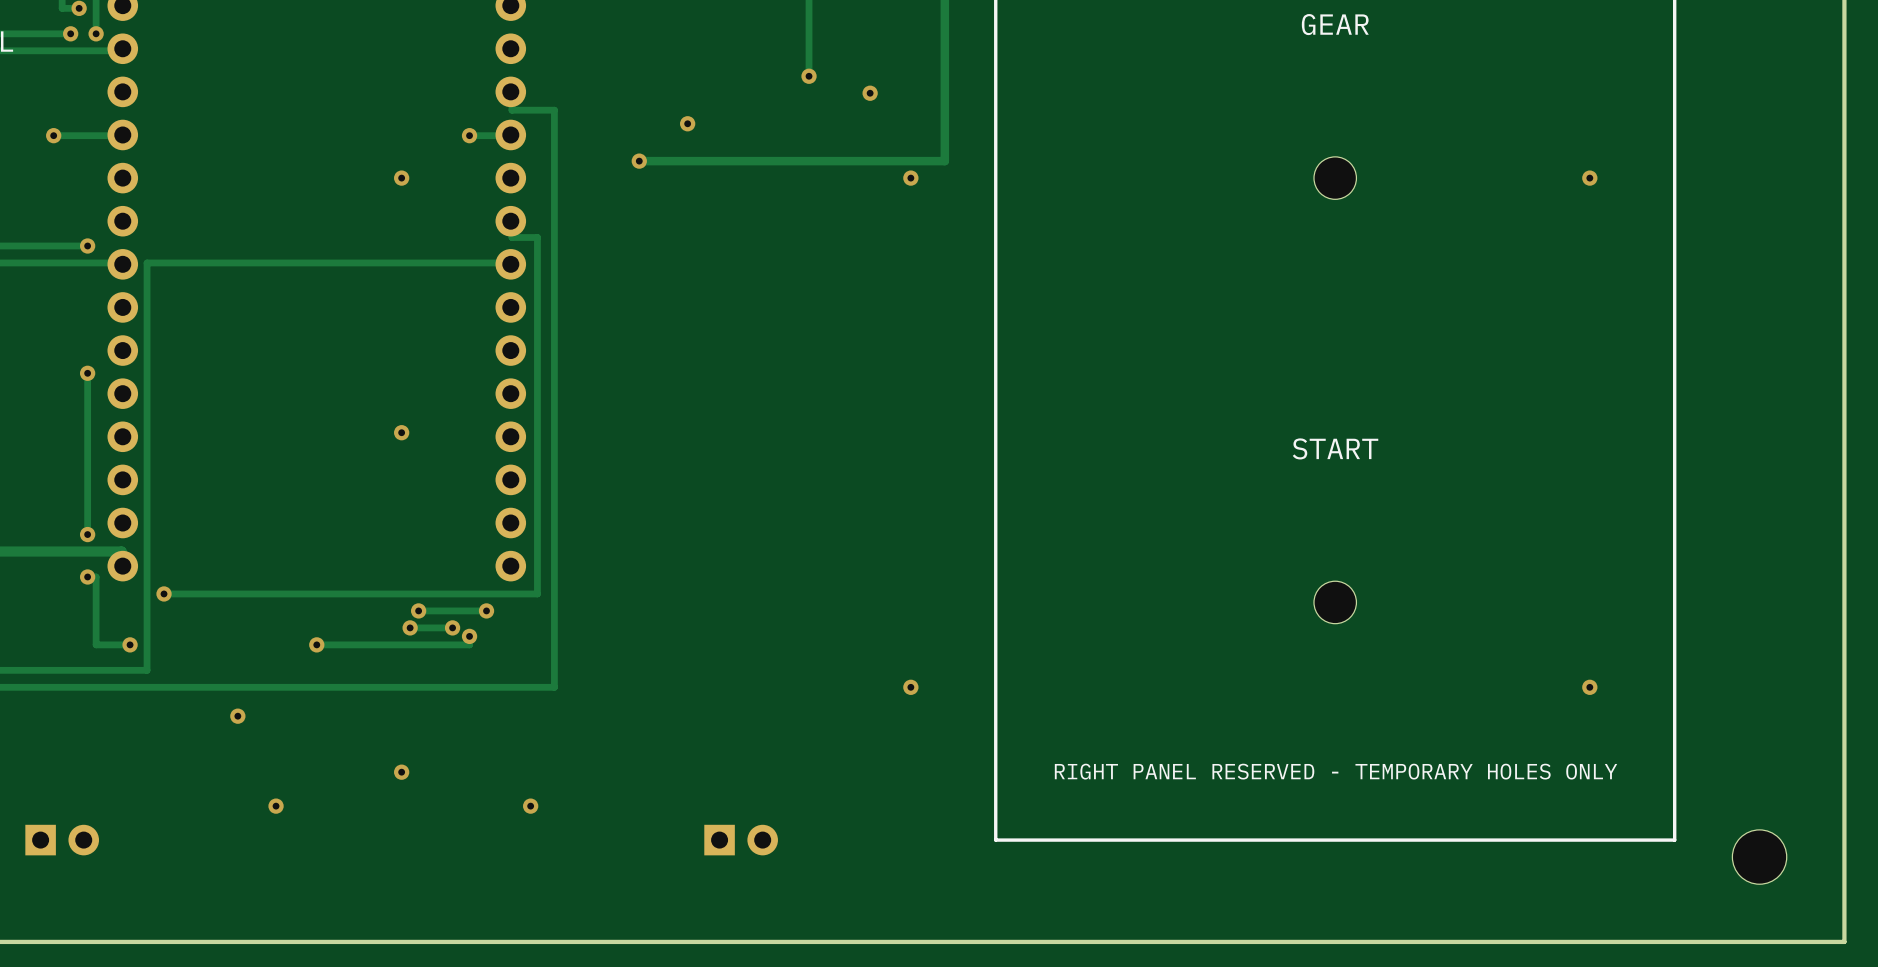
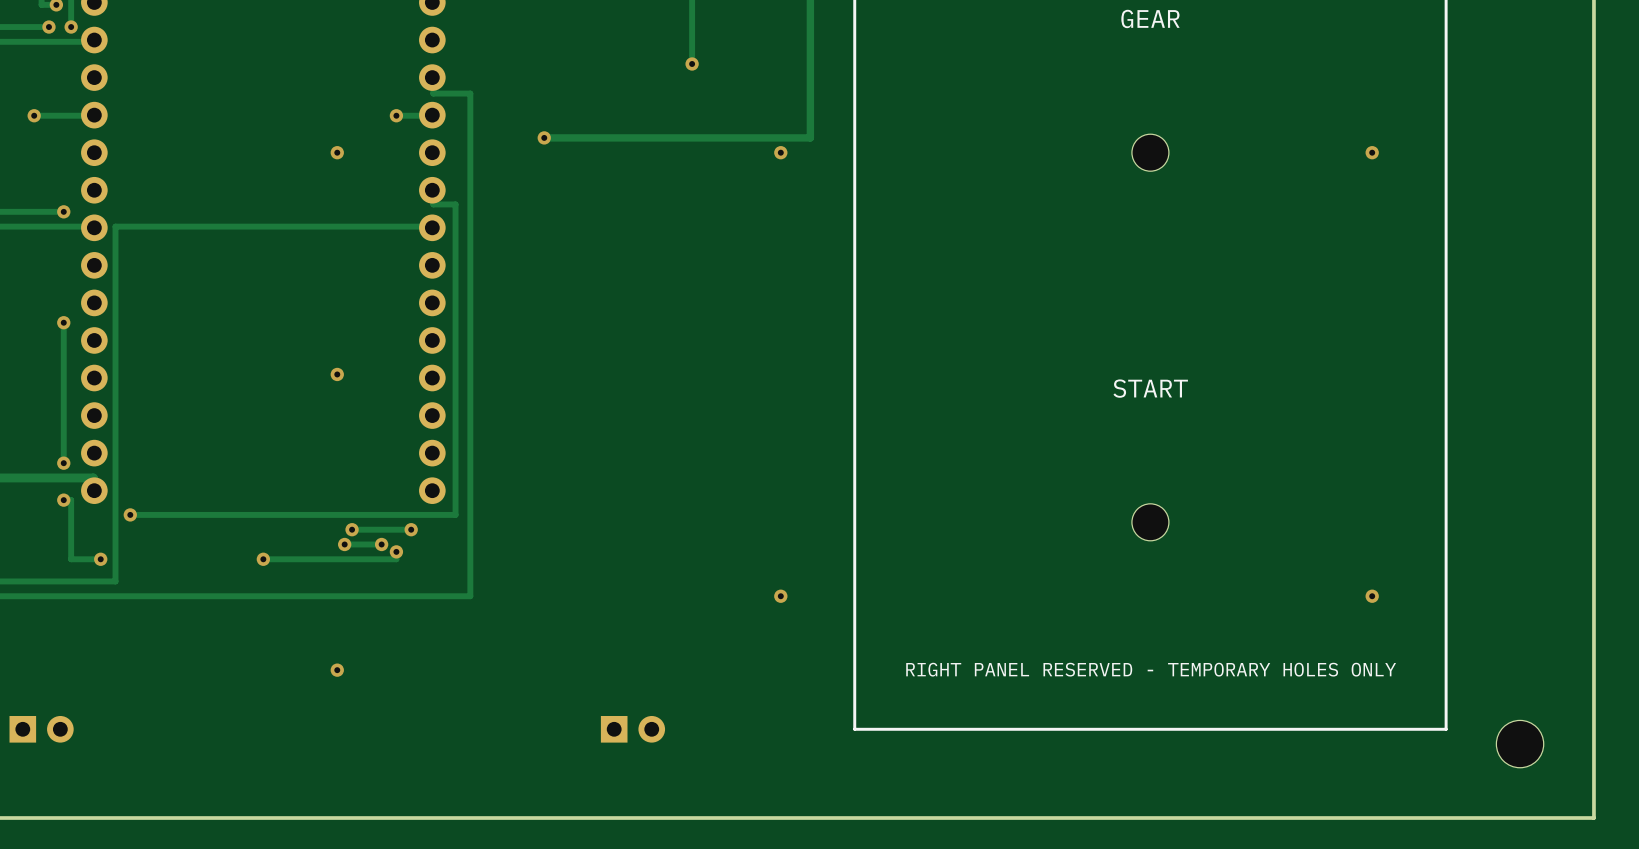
via: (870, 93) -> none
via: (687, 123) -> none
via: (237, 716) -> none
via: (276, 806) -> none
via: (530, 806) -> none

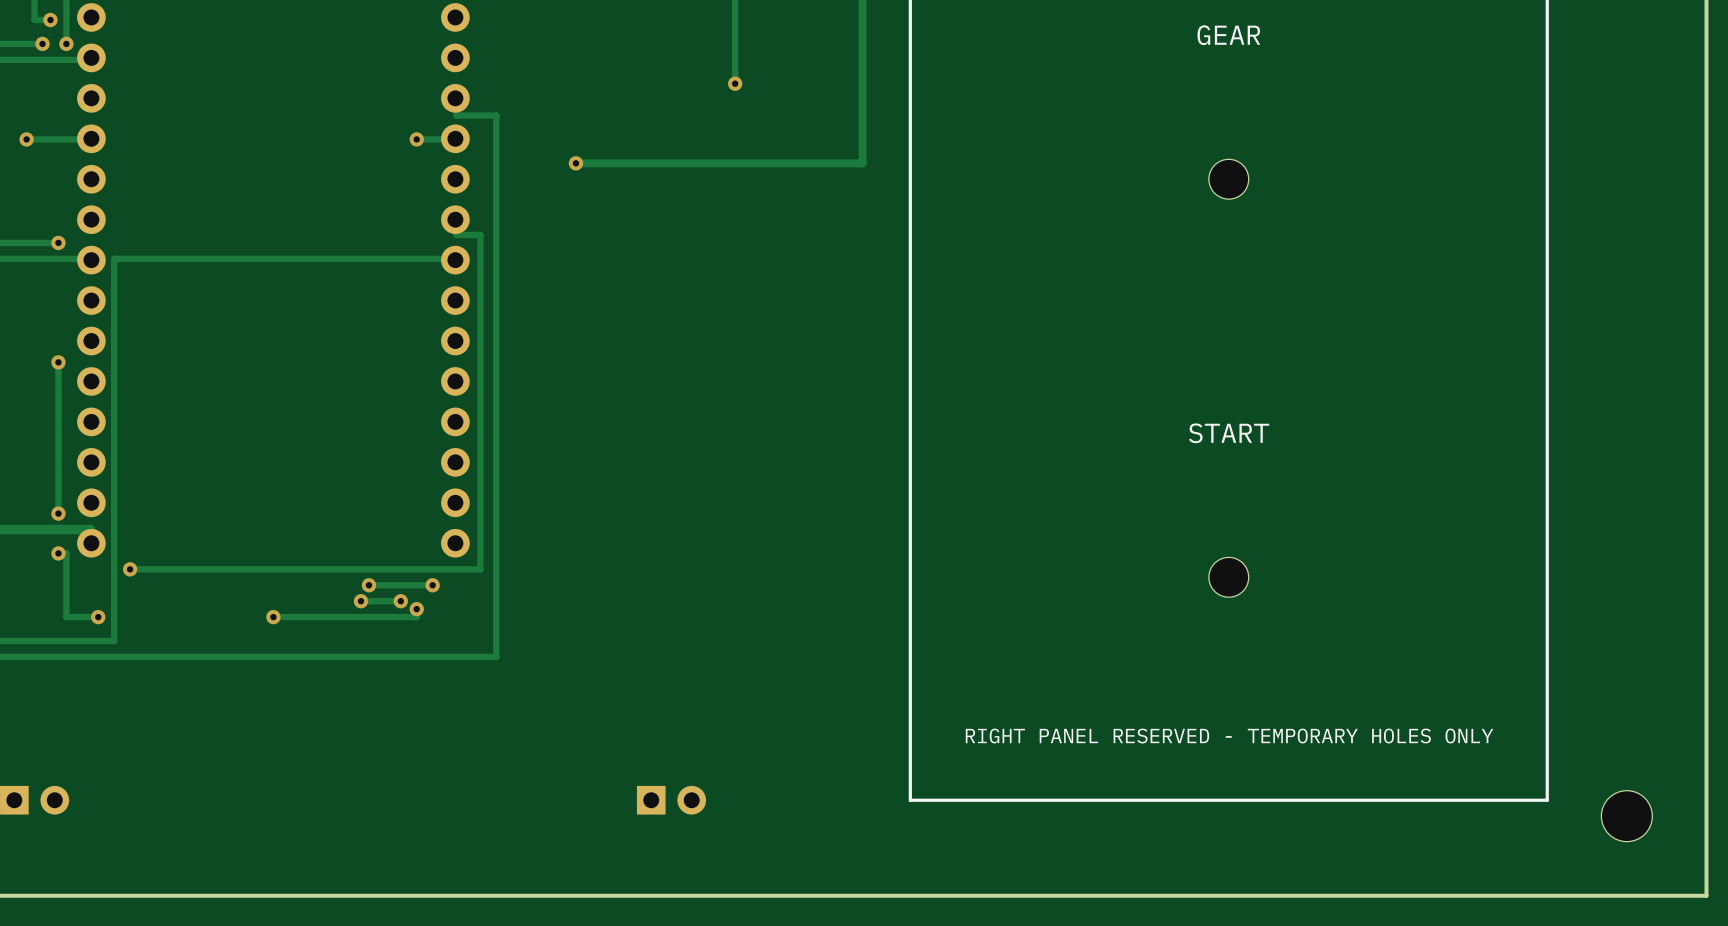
via: (337, 152) -> none
via: (780, 152) -> none
via: (1372, 152) -> none
via: (337, 374) -> none
via: (780, 596) -> none
via: (1372, 596) -> none
via: (337, 670) -> none

